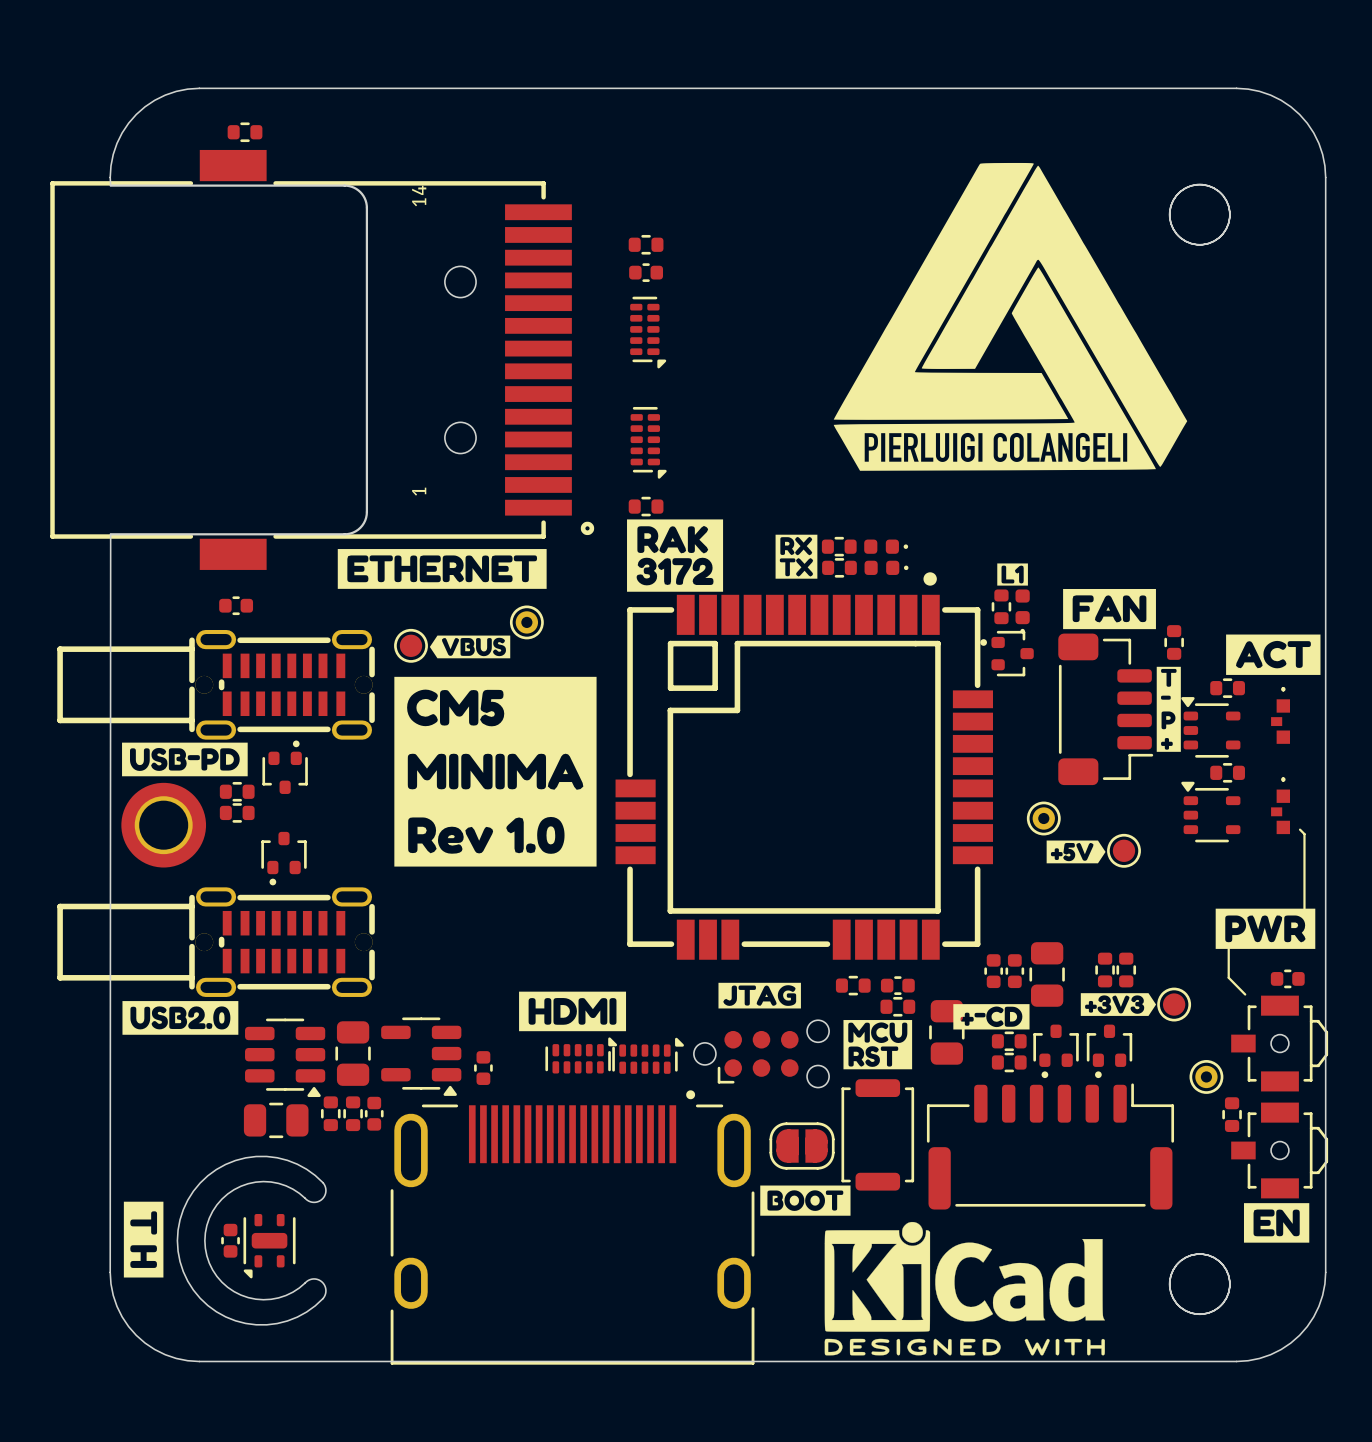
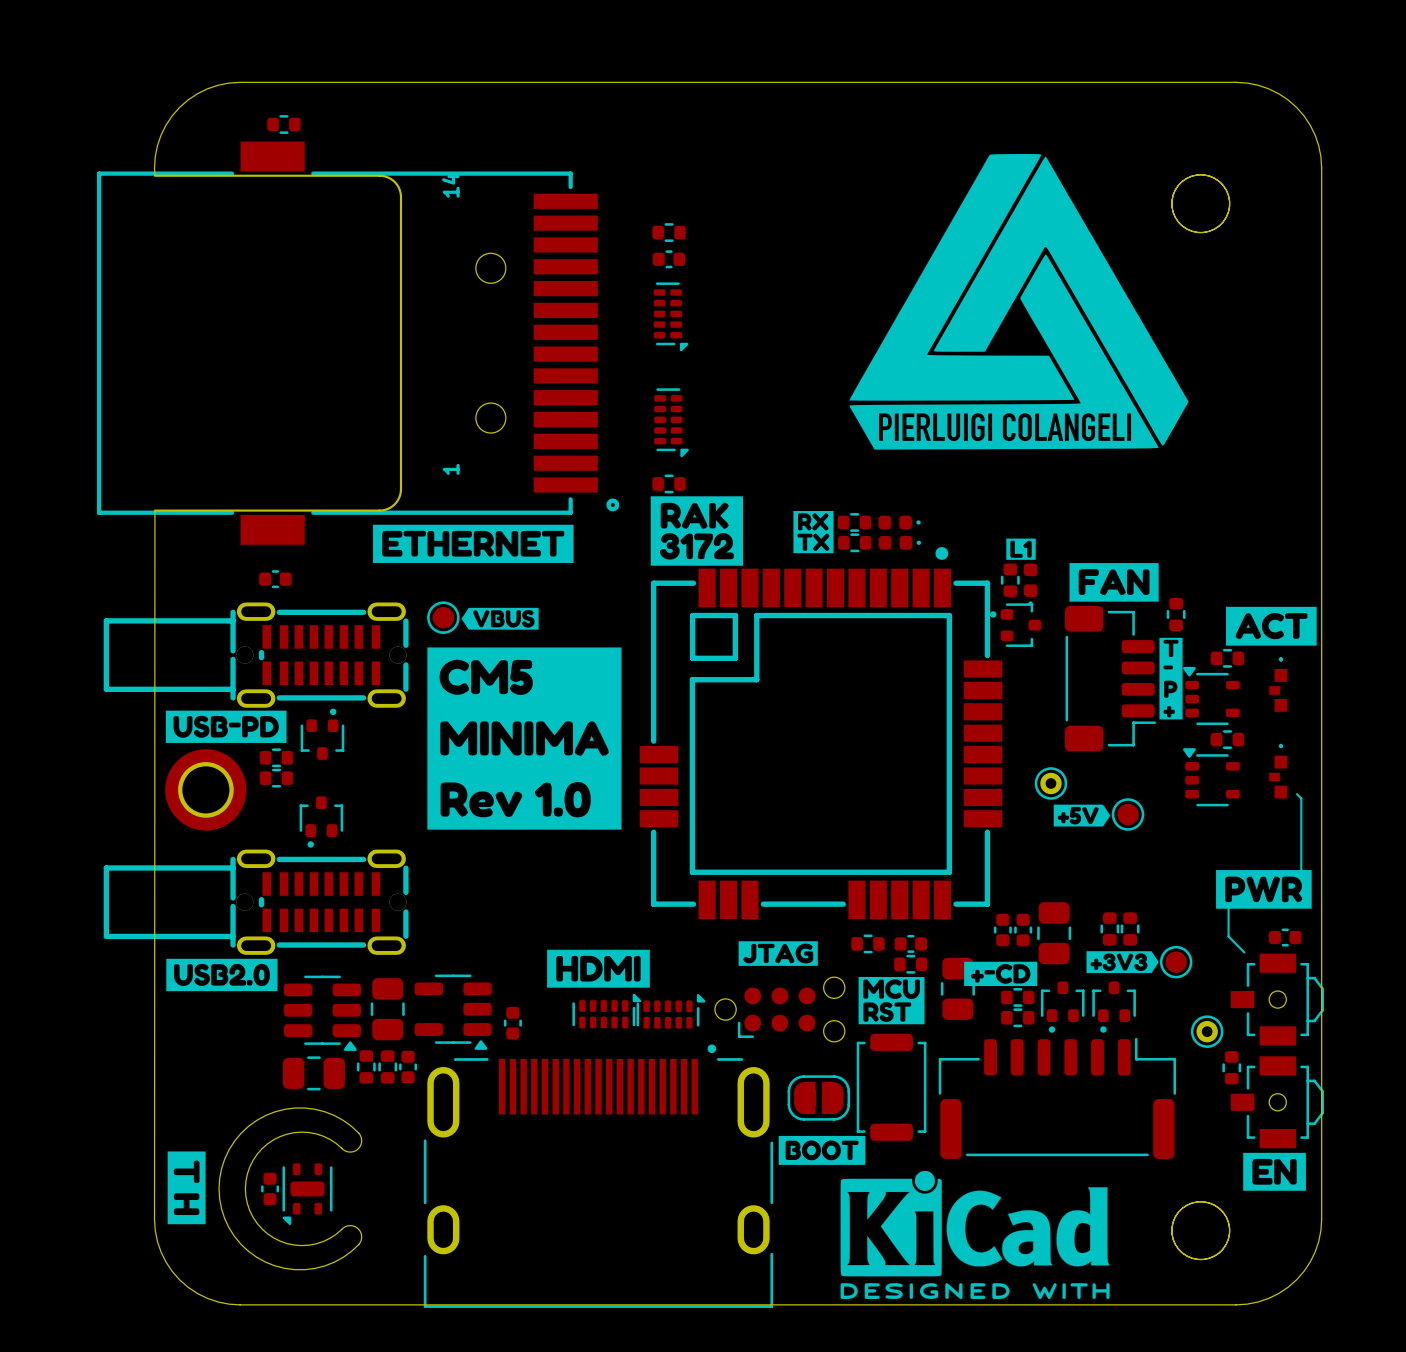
part: (526, 622) -> none

